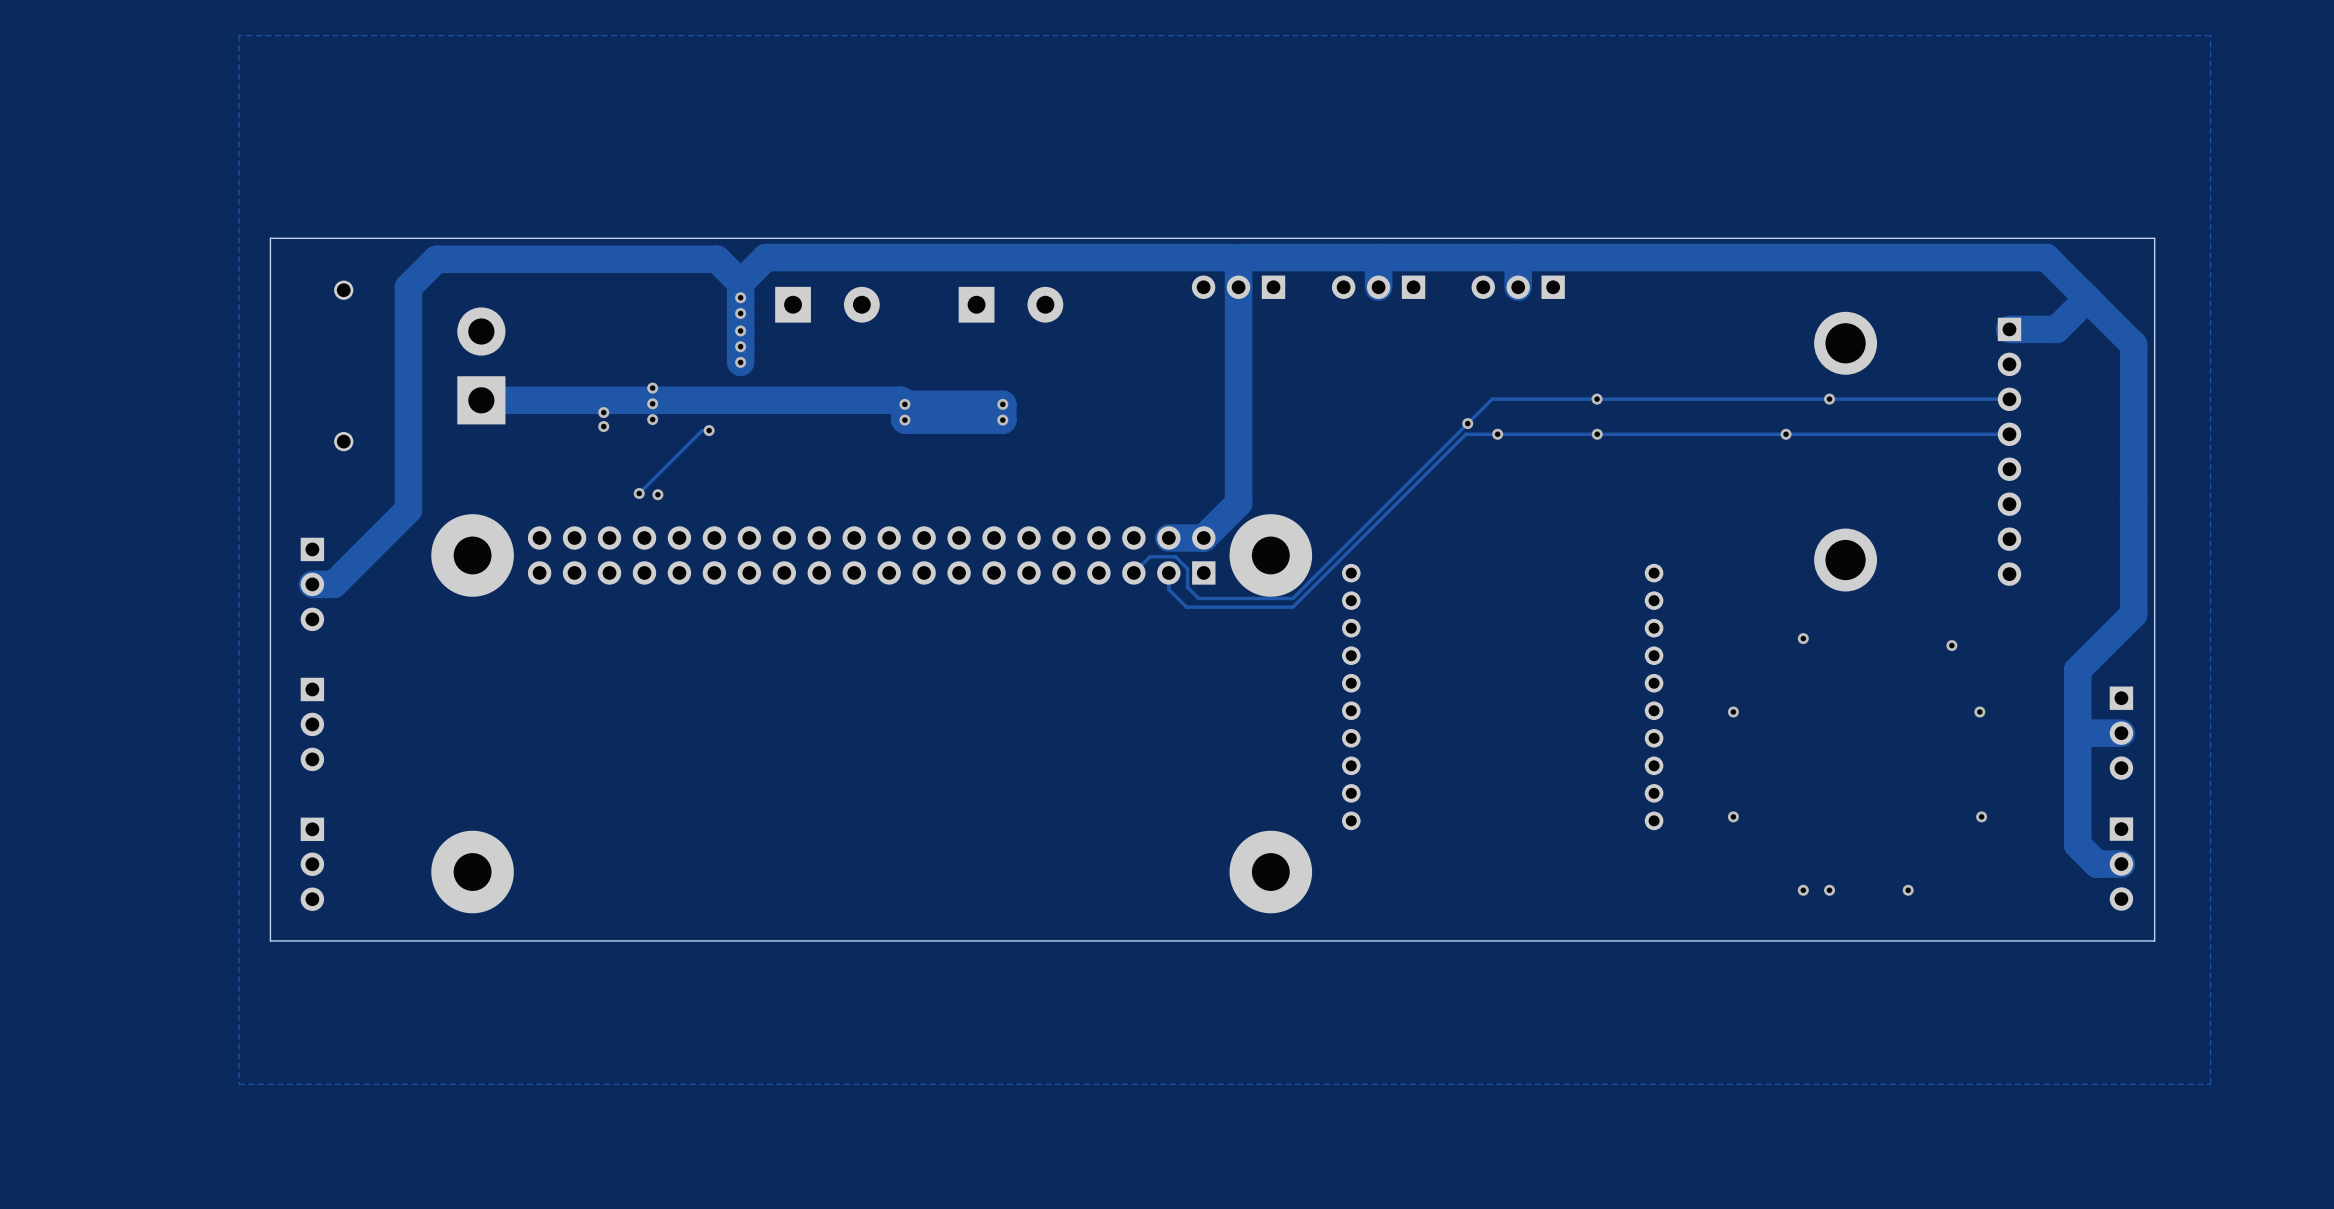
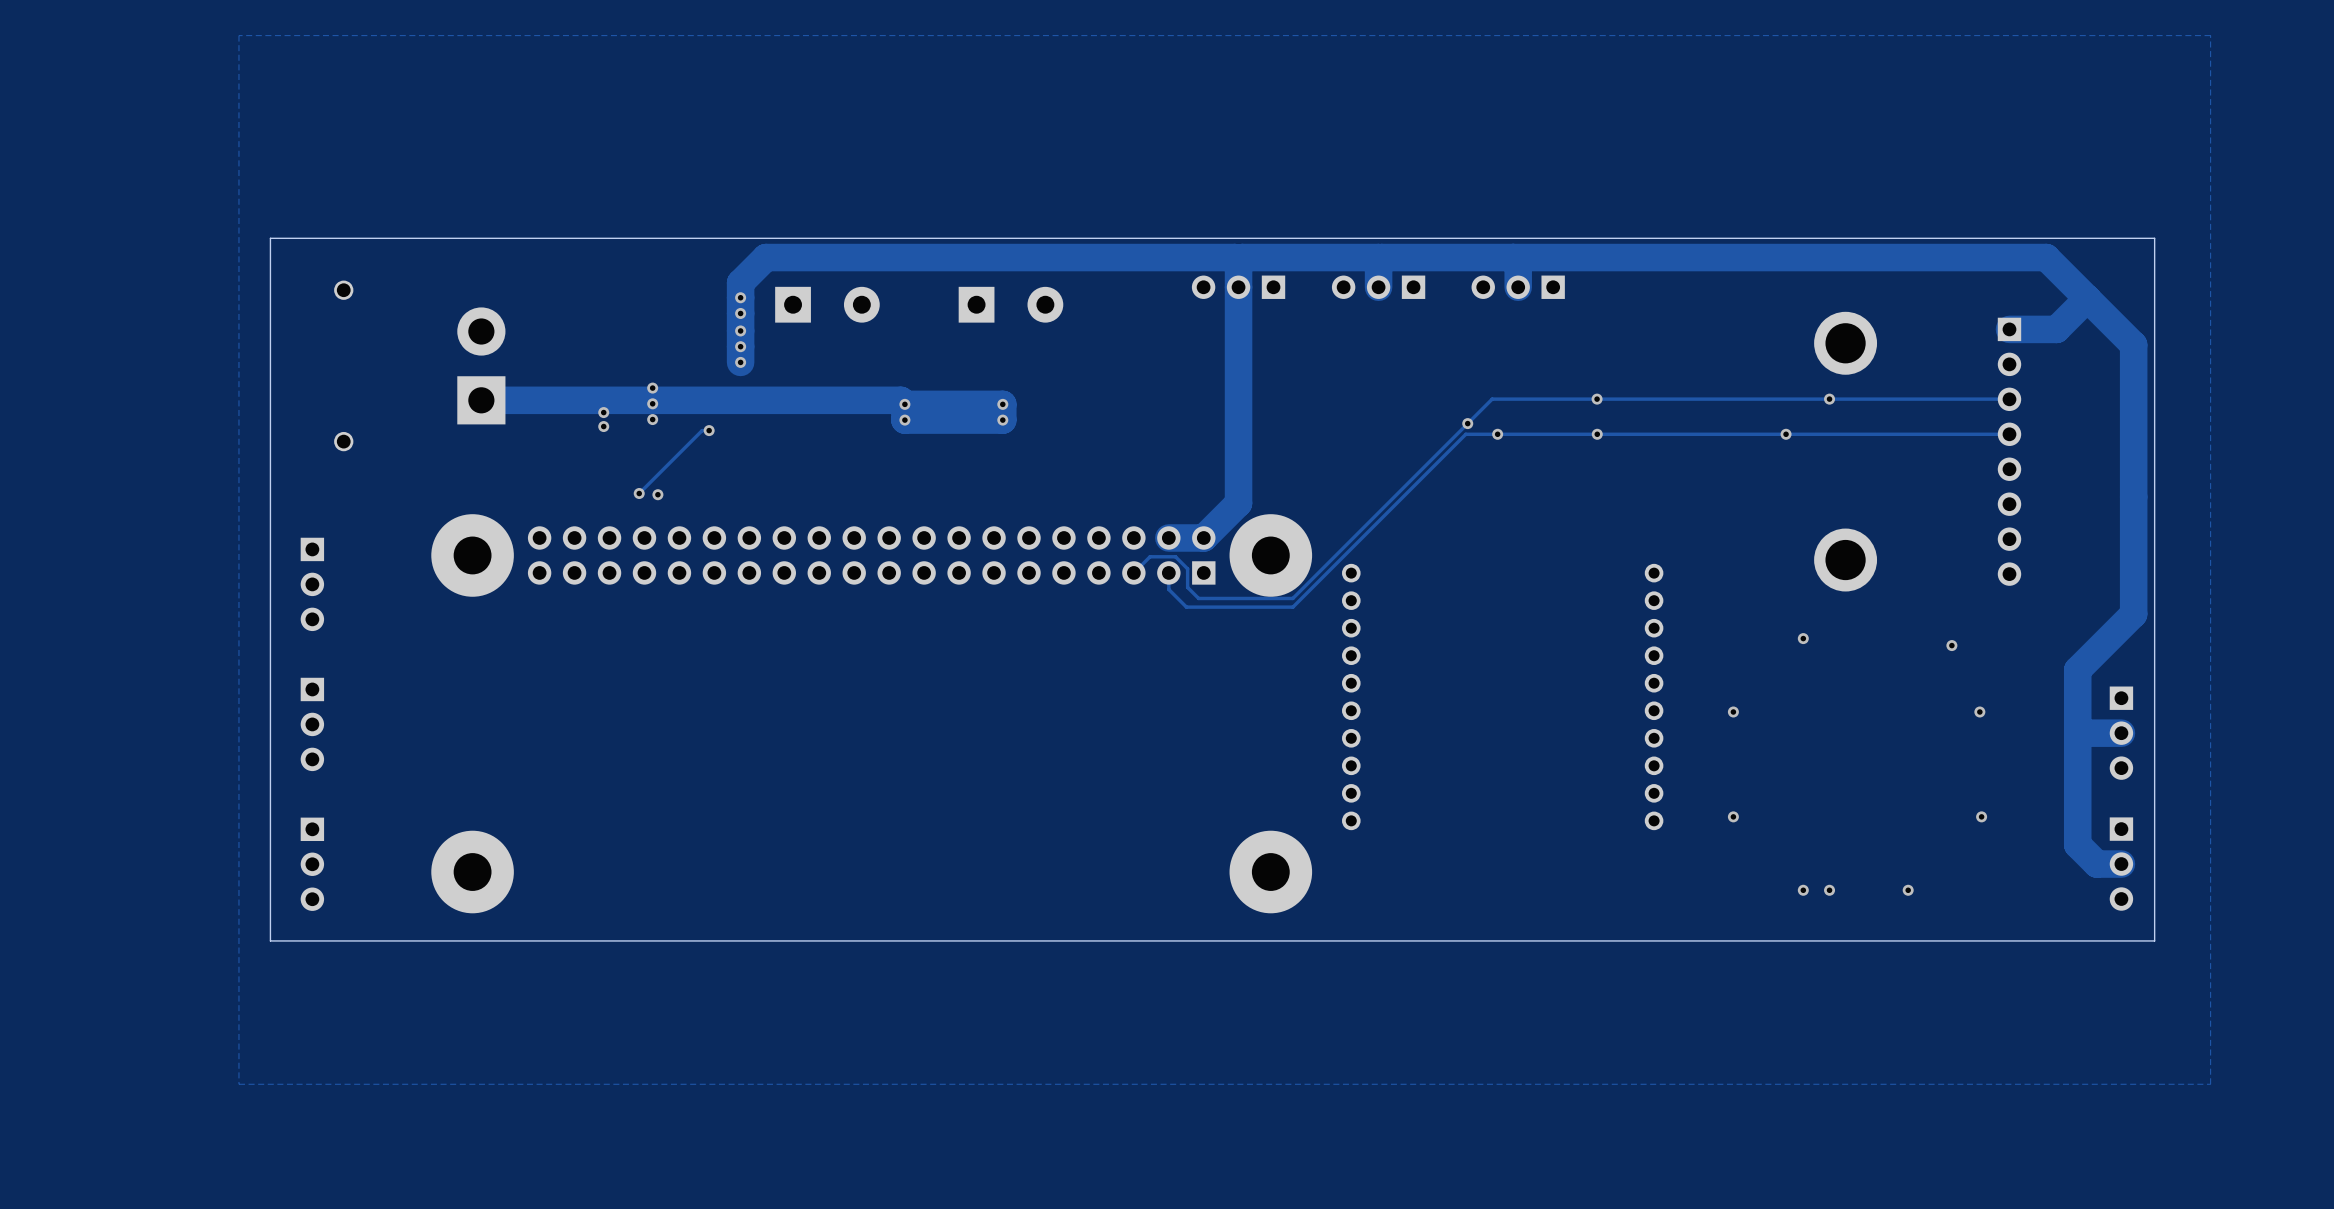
track: (740, 282) (717, 259) (436, 259) (408, 287) (408, 509) (333, 584) (312, 584) -> none

